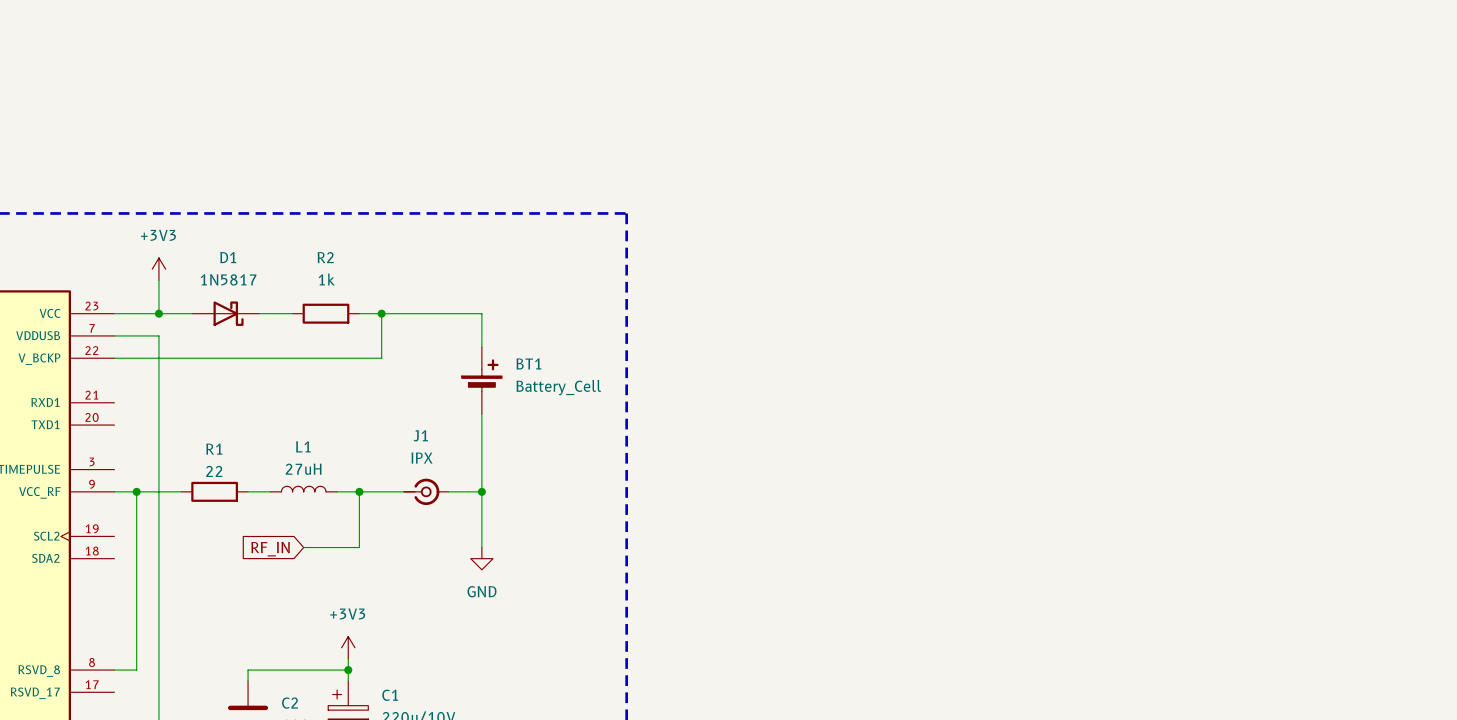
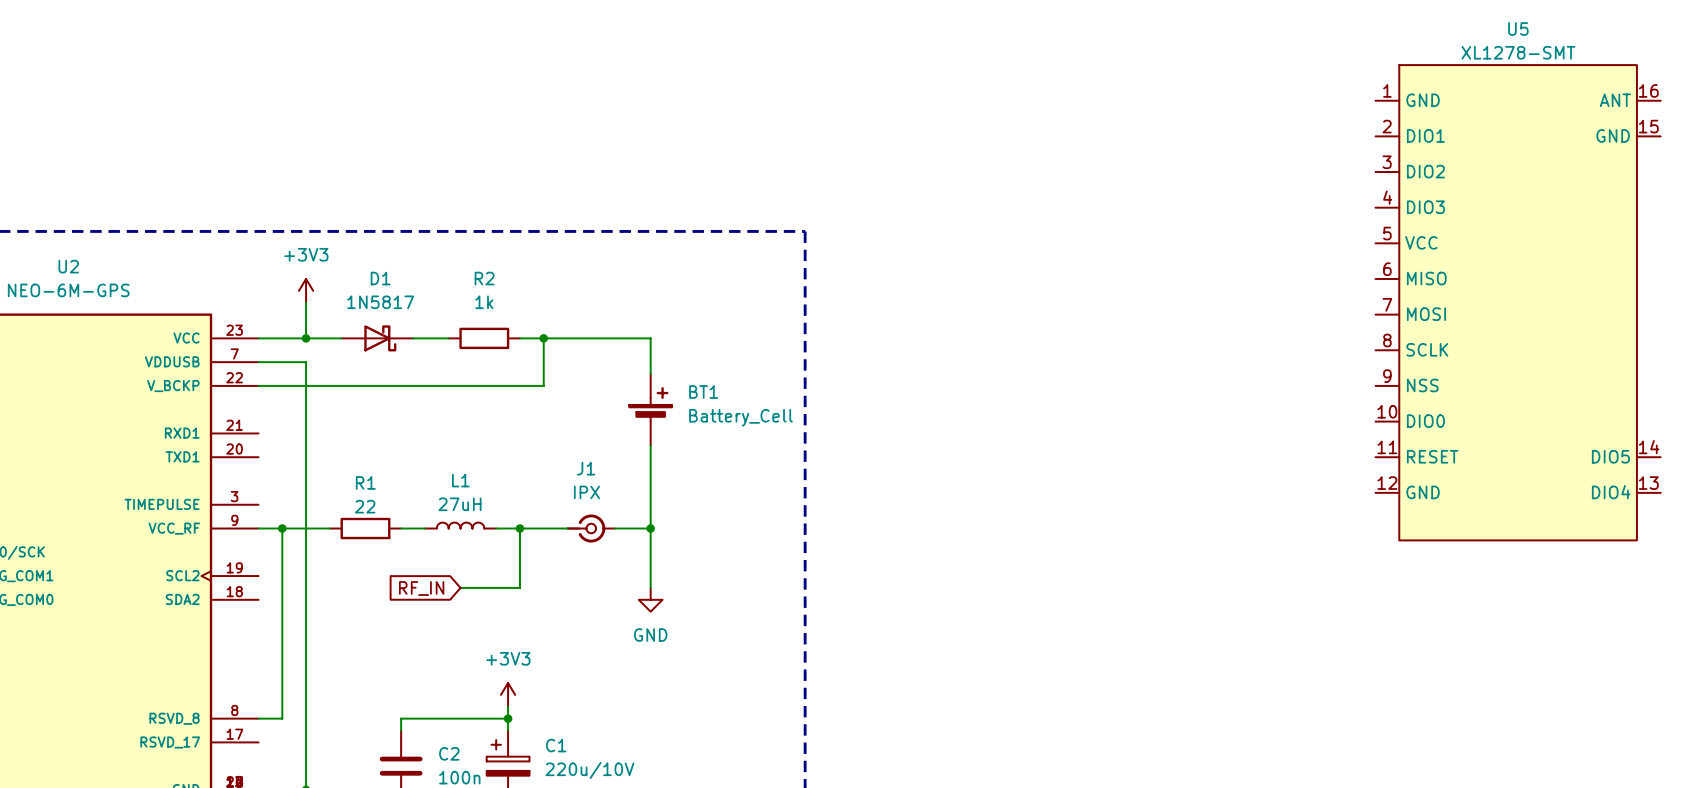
U5: none -> XL1278-SMT (1518, 302)

